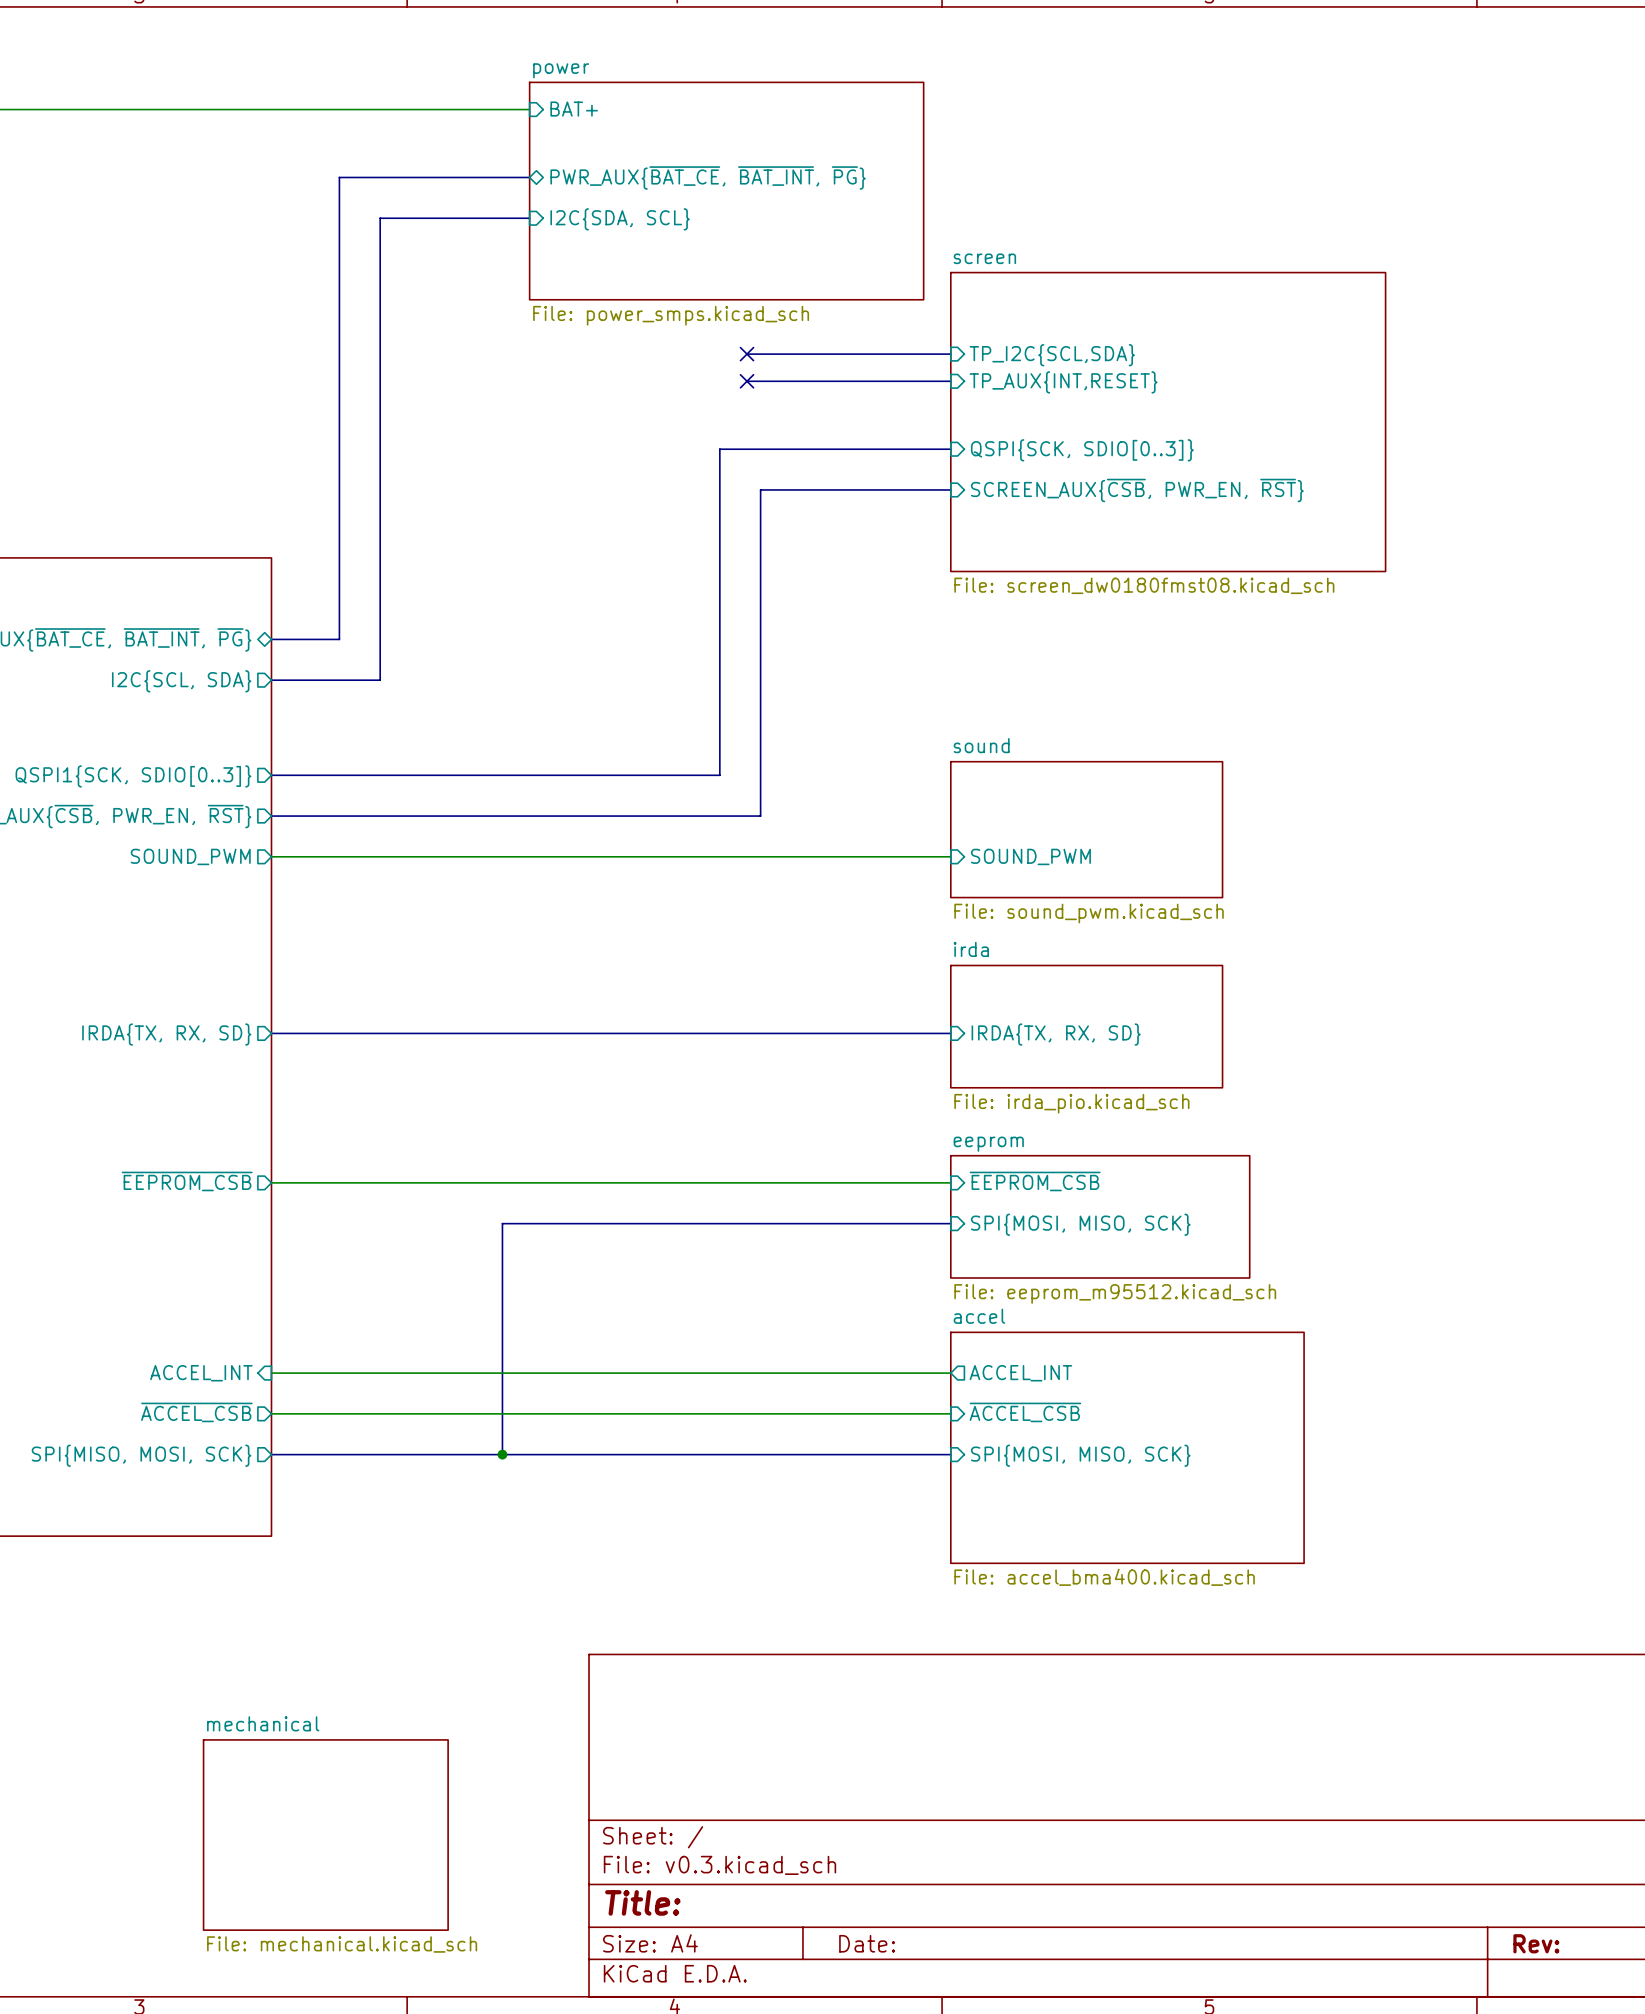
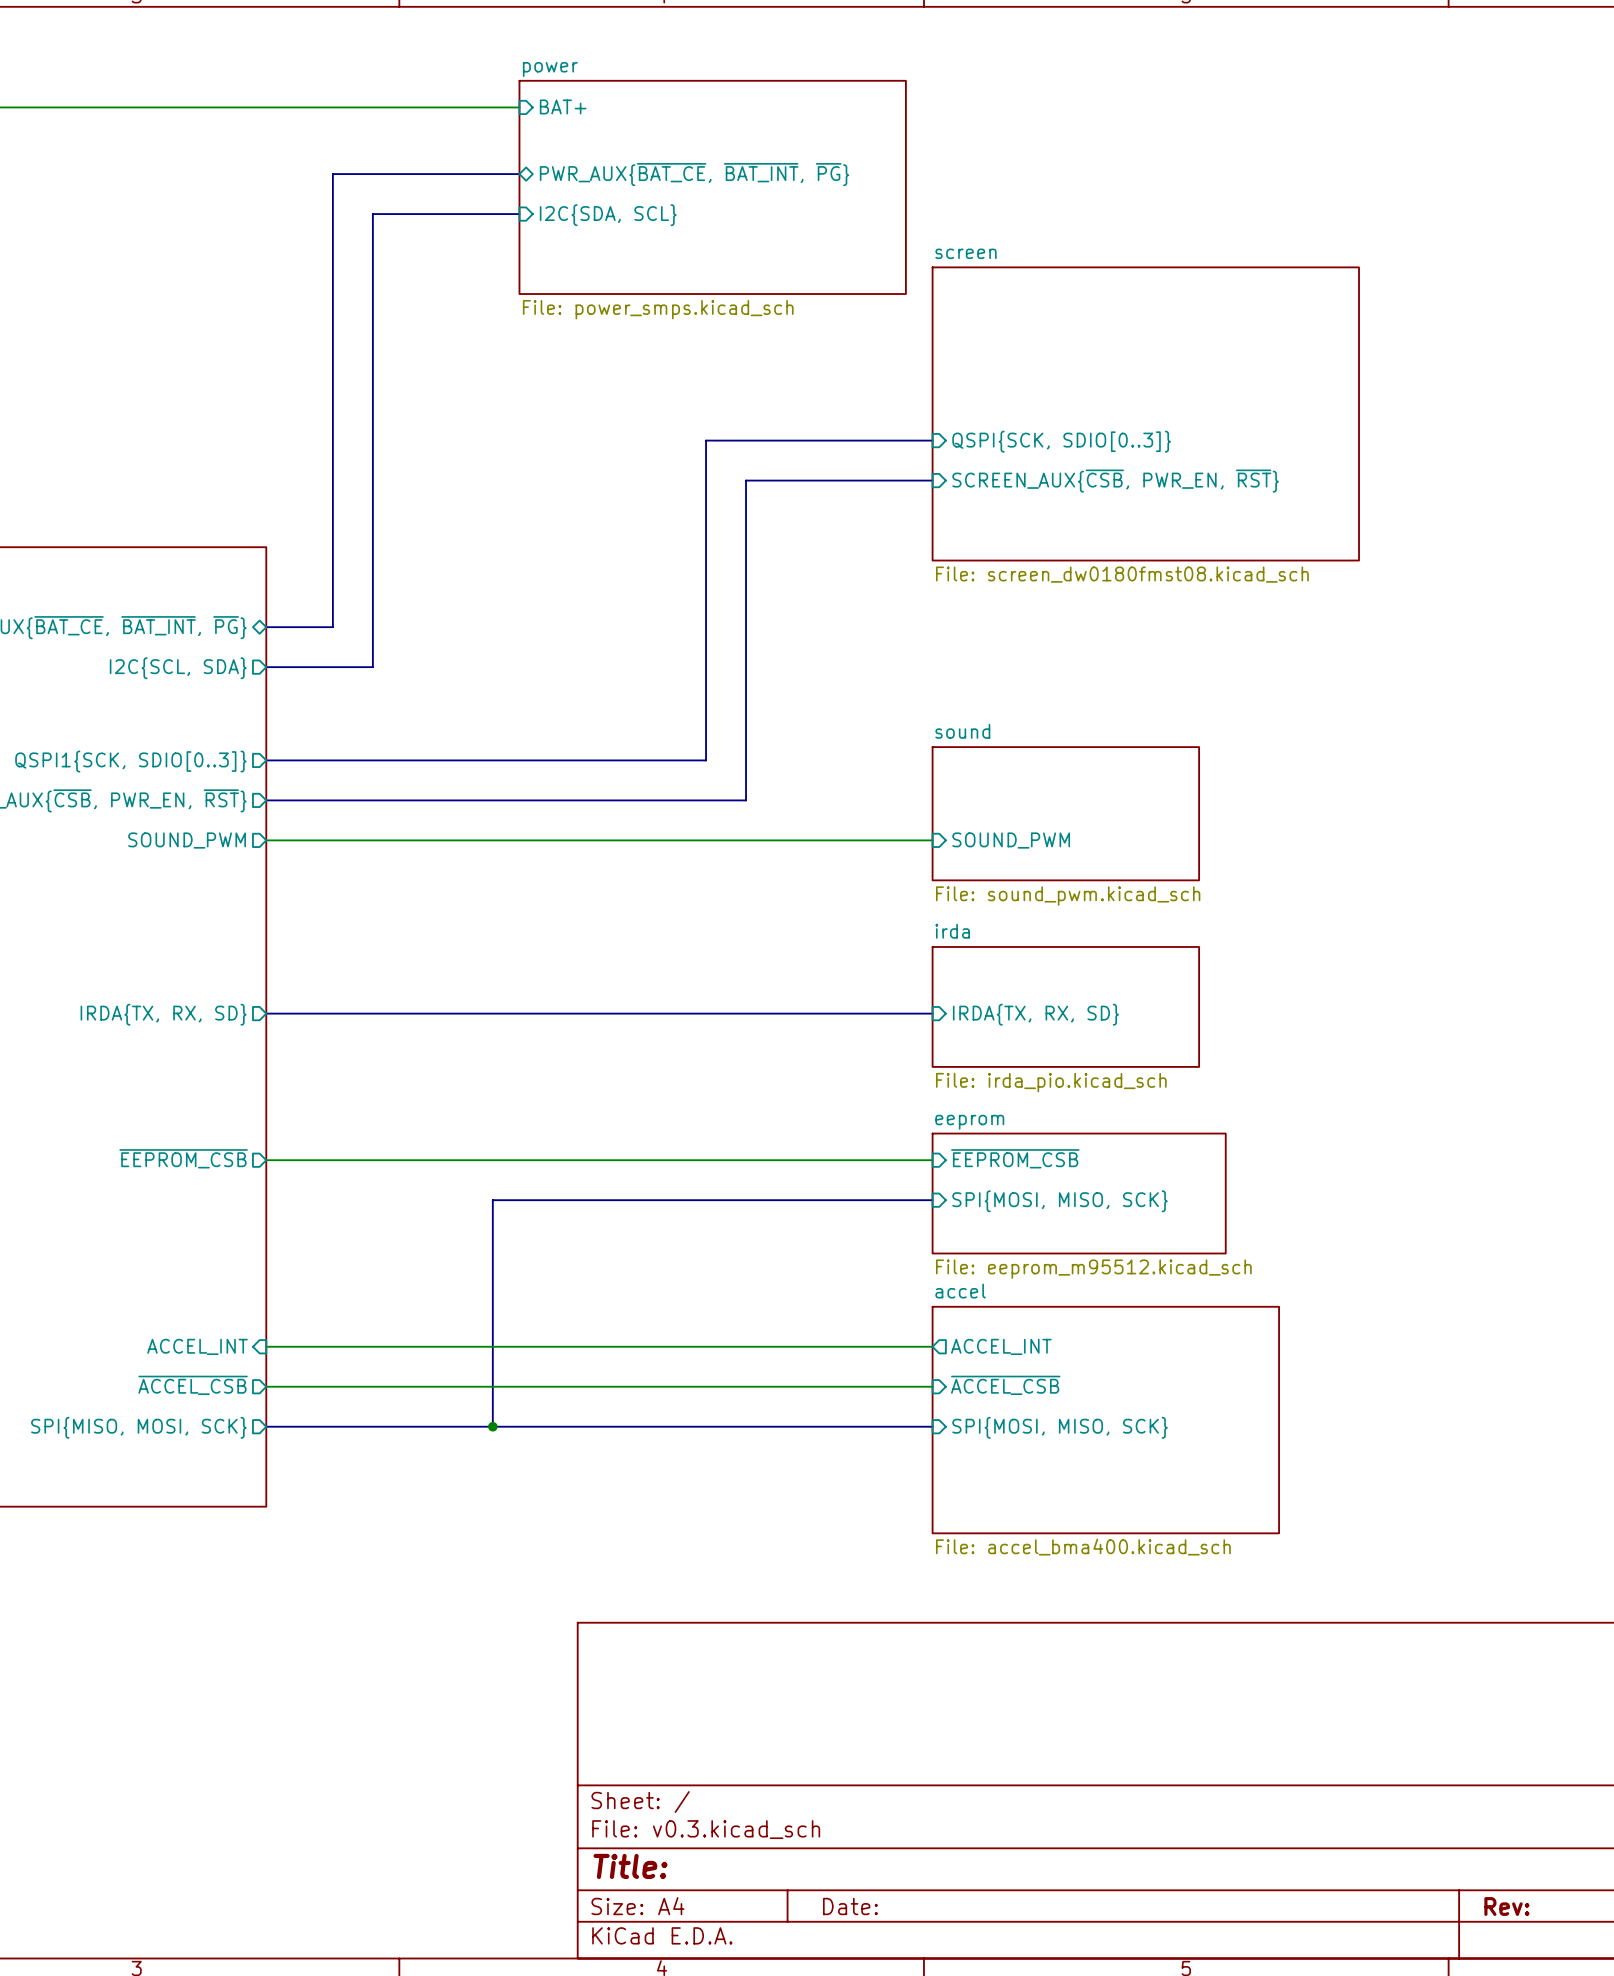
bus: (747, 354) (950, 354) -> none
no-connect mark: (747, 354) -> none
sheet pin: TP_I2C{SCL,SDA} (1052, 355) -> none
bus: (747, 381) (950, 381) -> none
no-connect mark: (747, 381) -> none
sheet pin: TP_AUX{INT,RESET} (1063, 382) -> none
sheet mechanical: File: mechanical.kicad_sch (325, 1835) -> none

